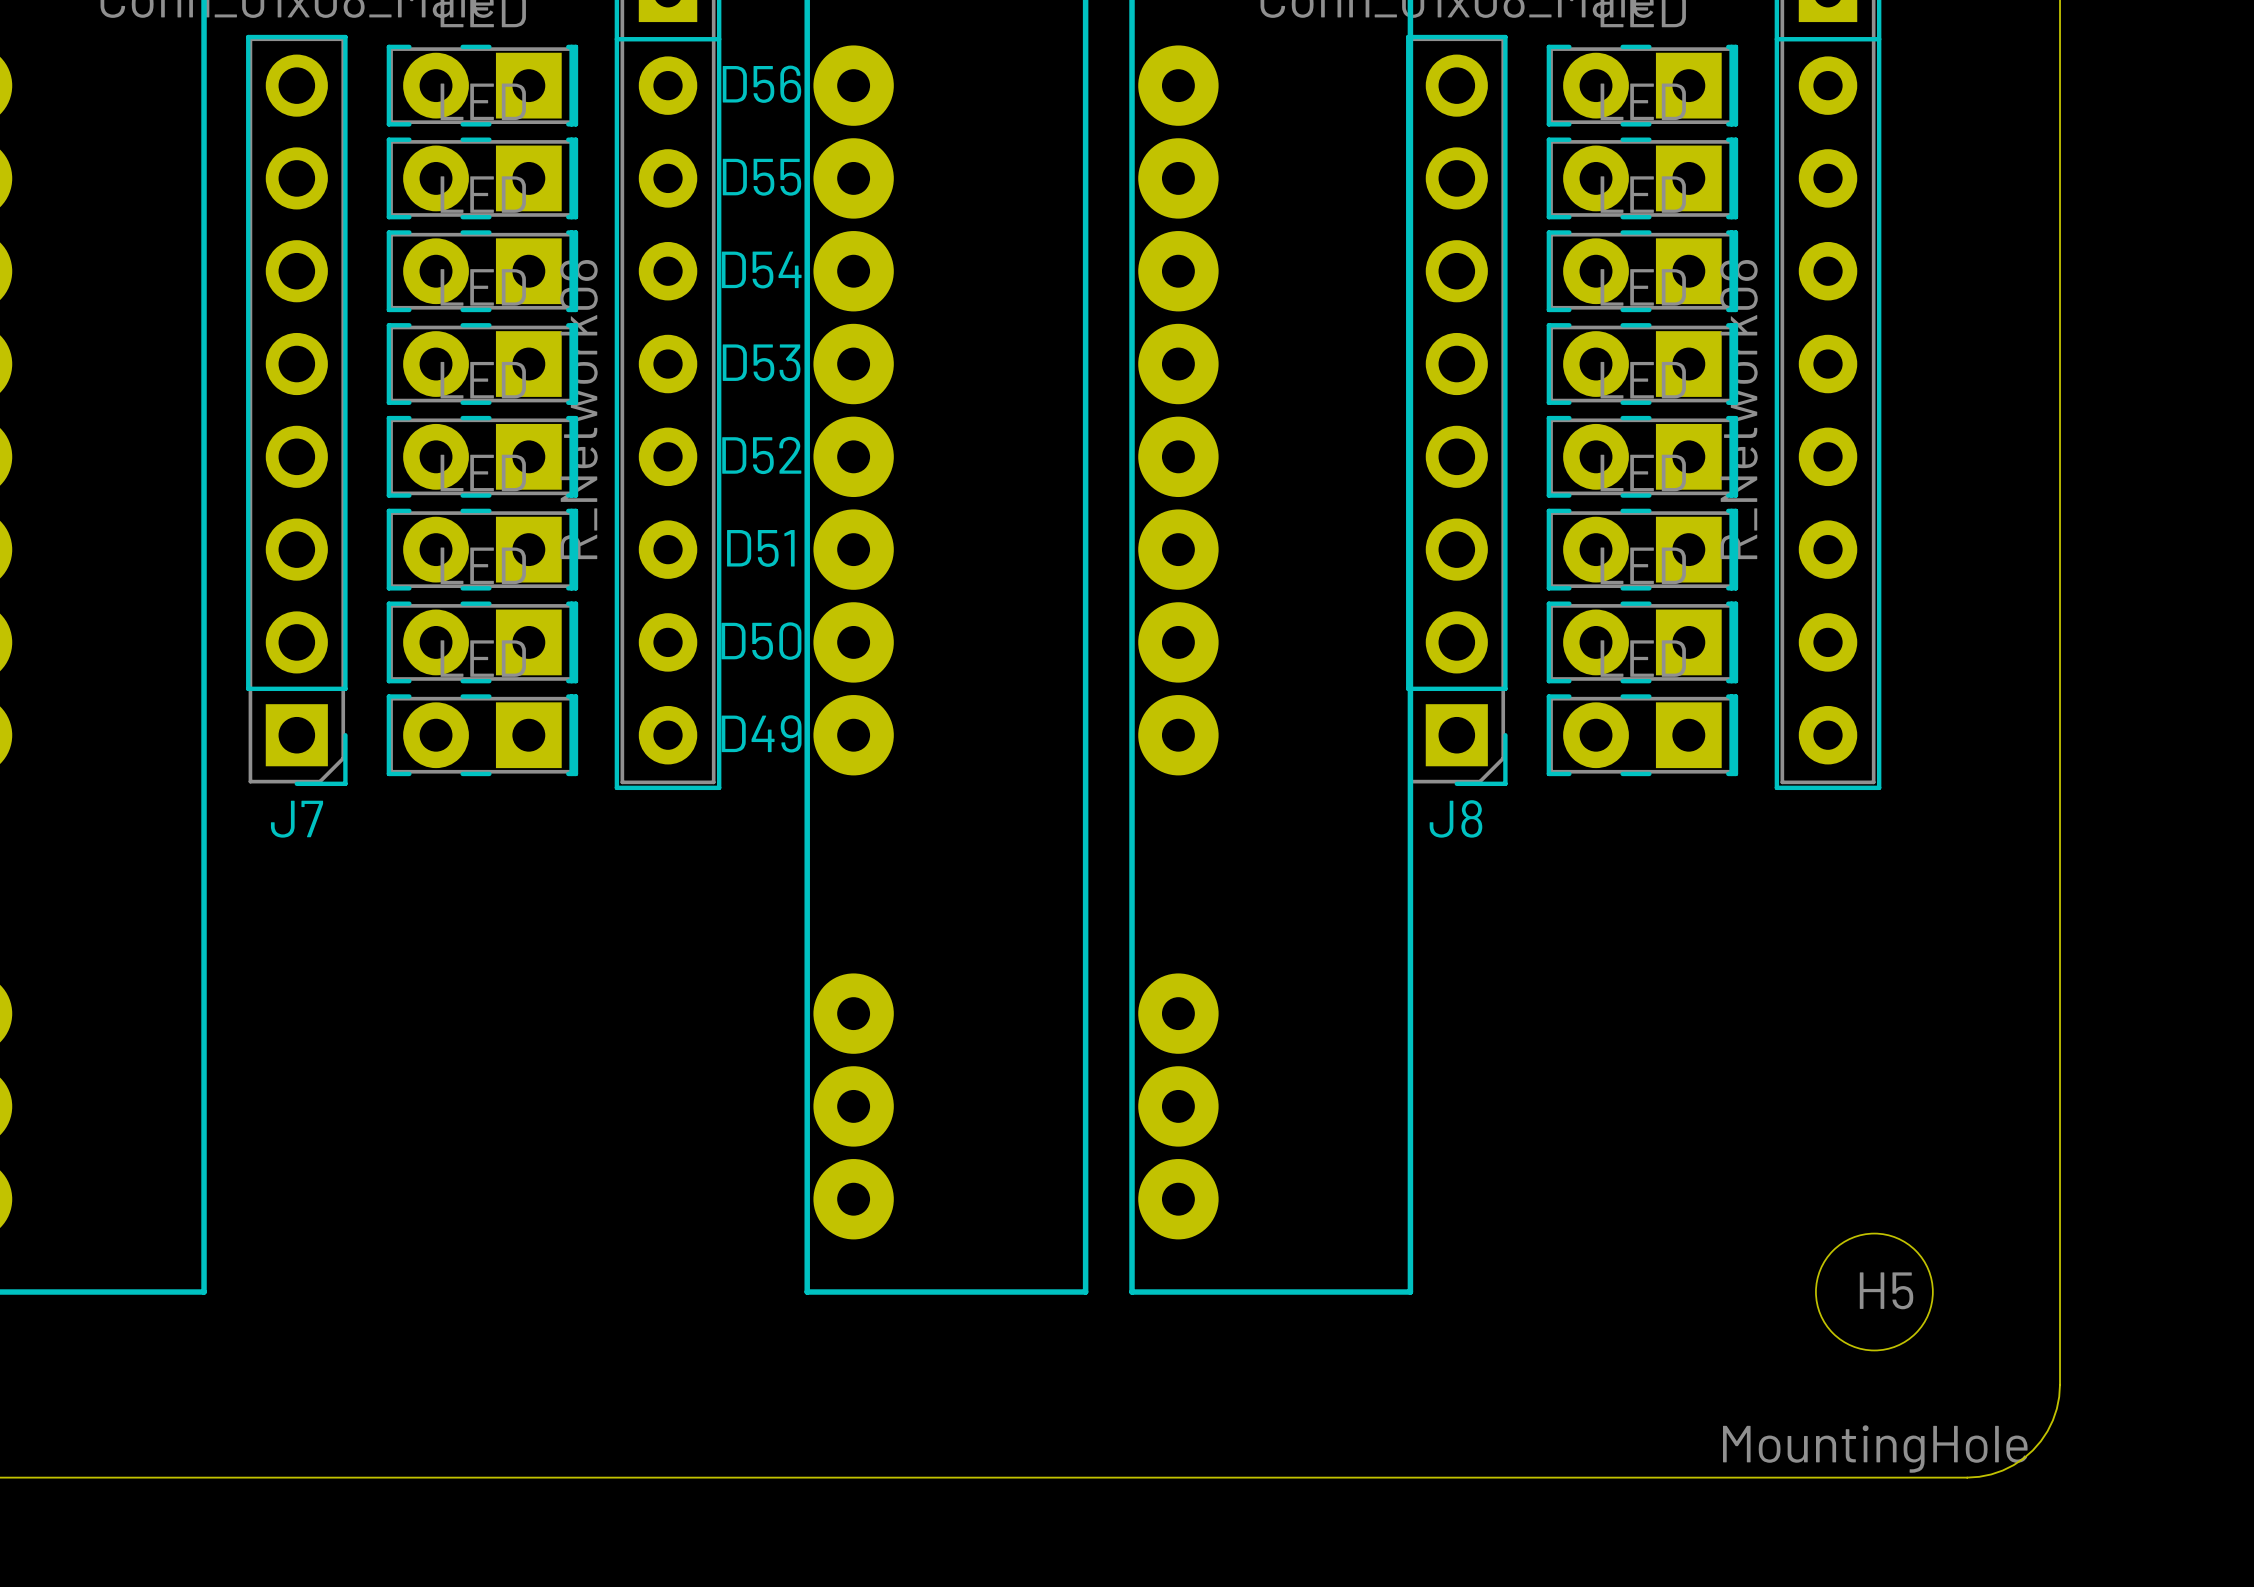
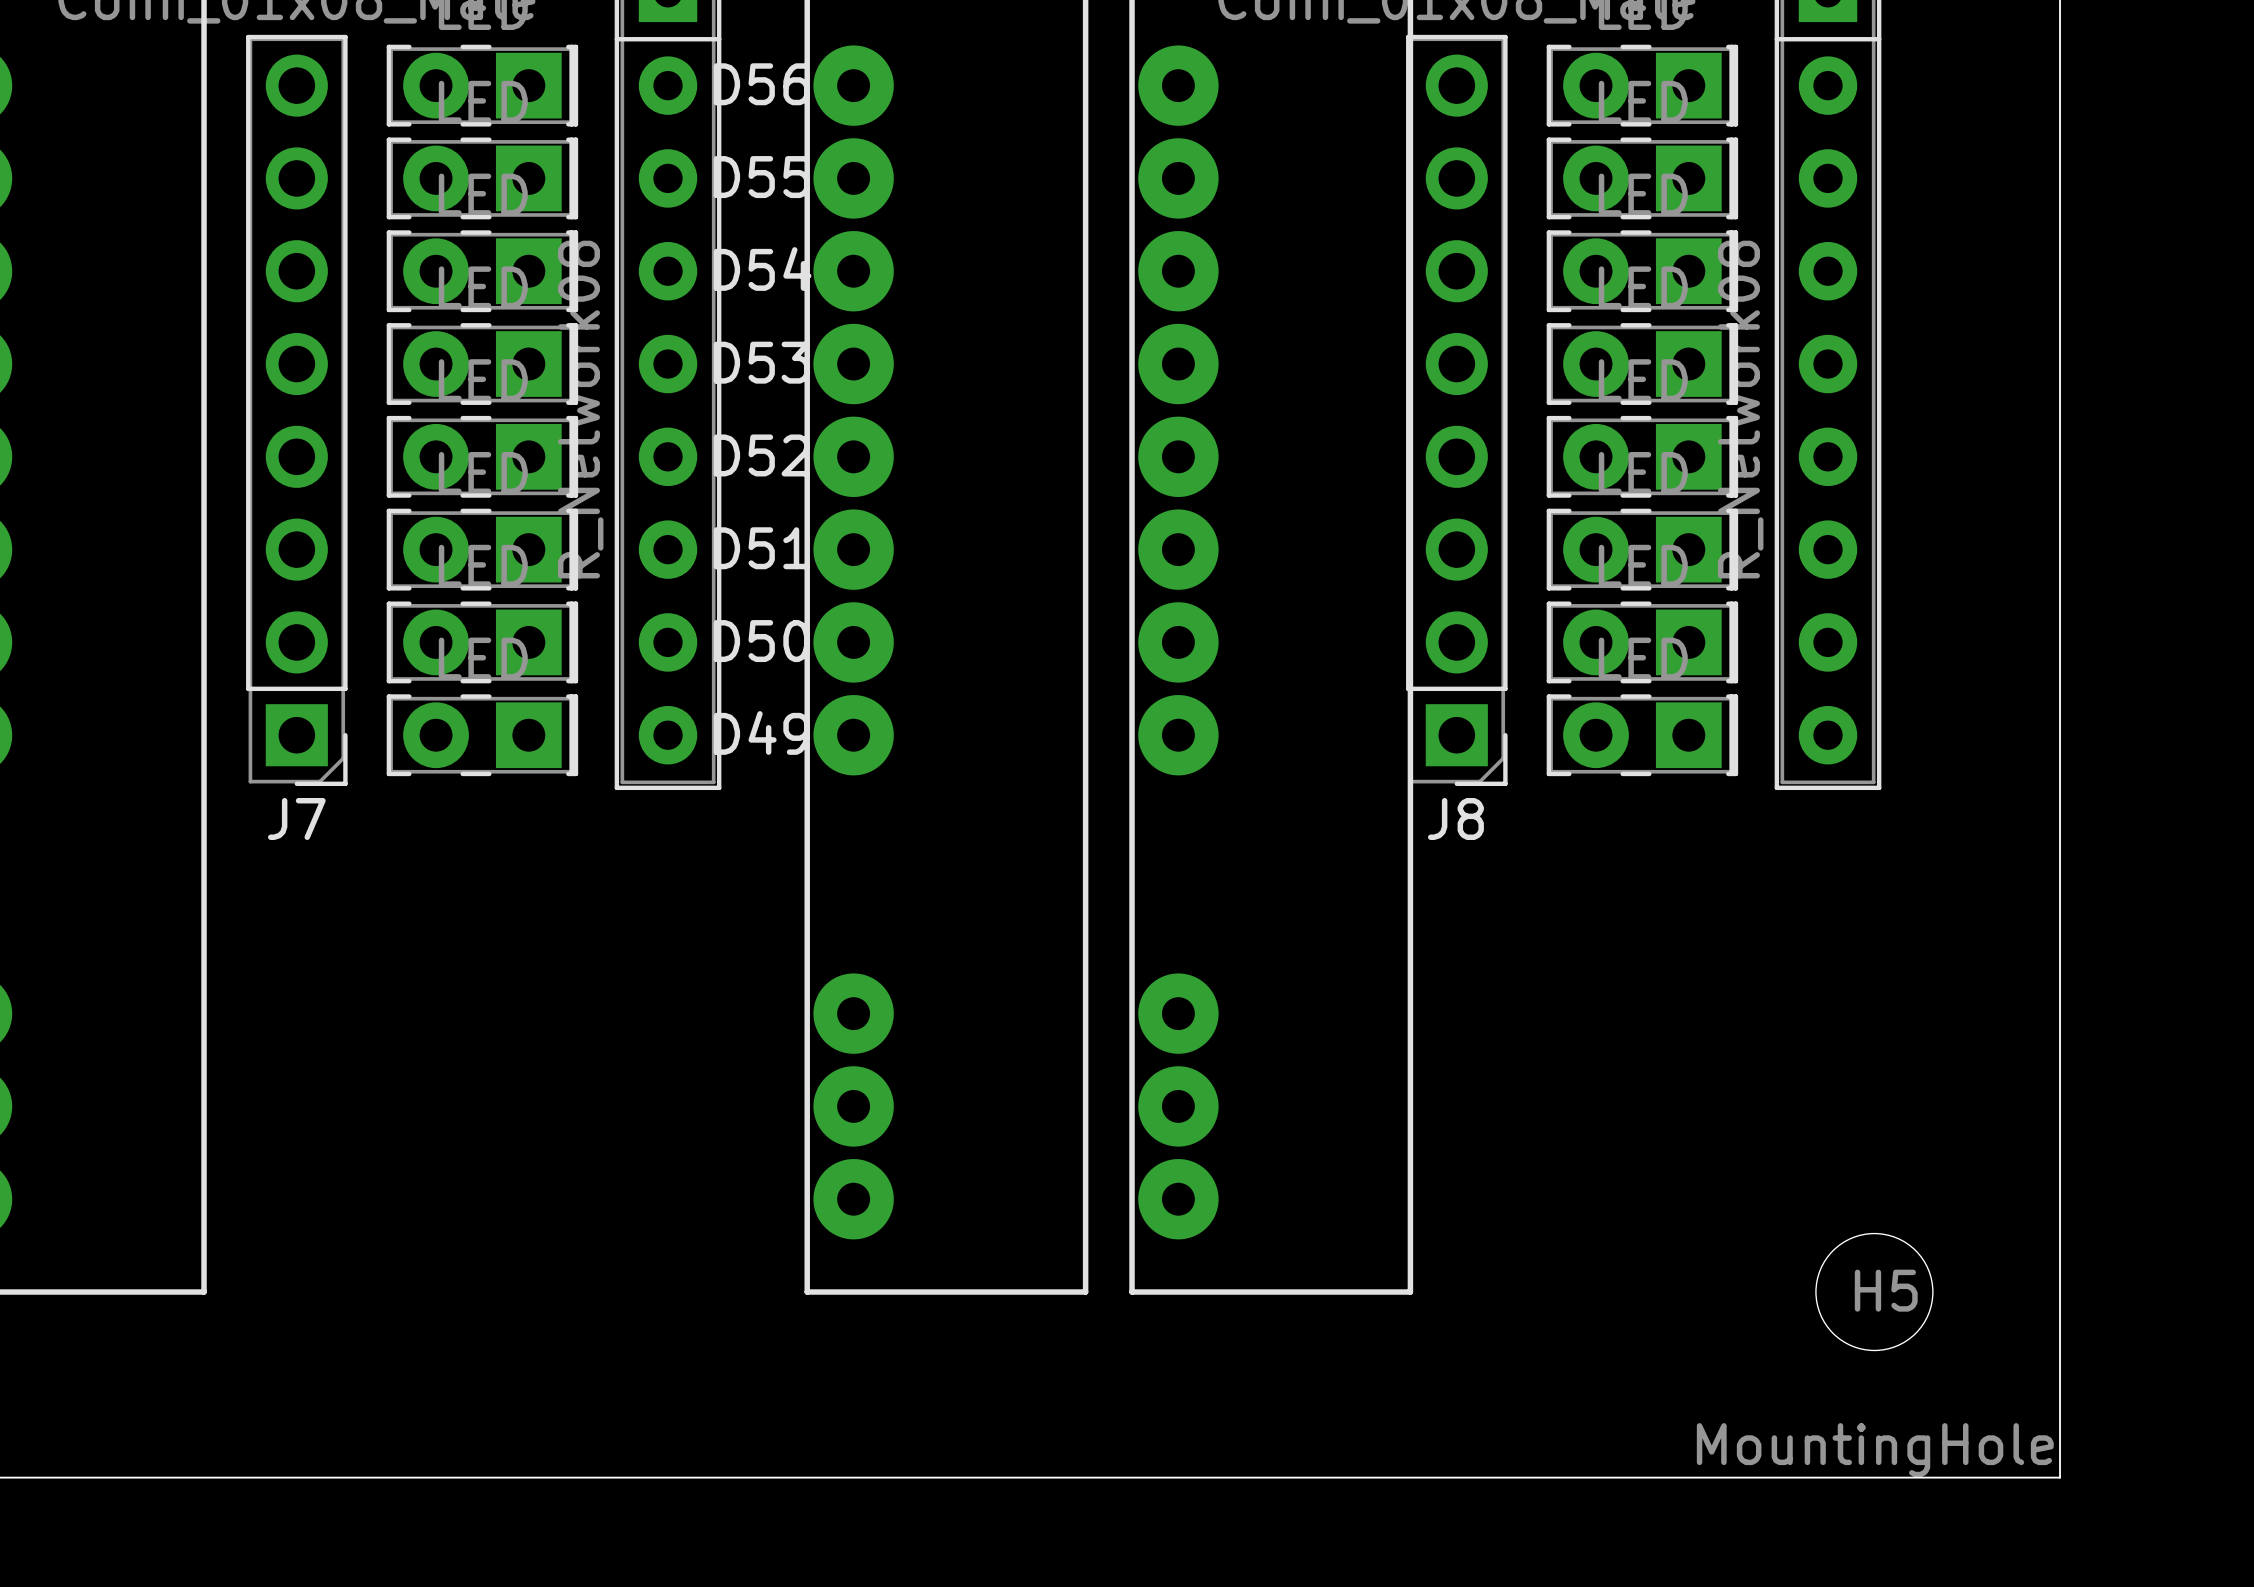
board edge: (2060, 1384) (2059, 1396) (2052, 1420) (2047, 1431) (2032, 1450) (2013, 1465) (2002, 1470) (1979, 1476) (1967, 1477) -> (2060, 1384) (2060, 1477) (1967, 1477)

